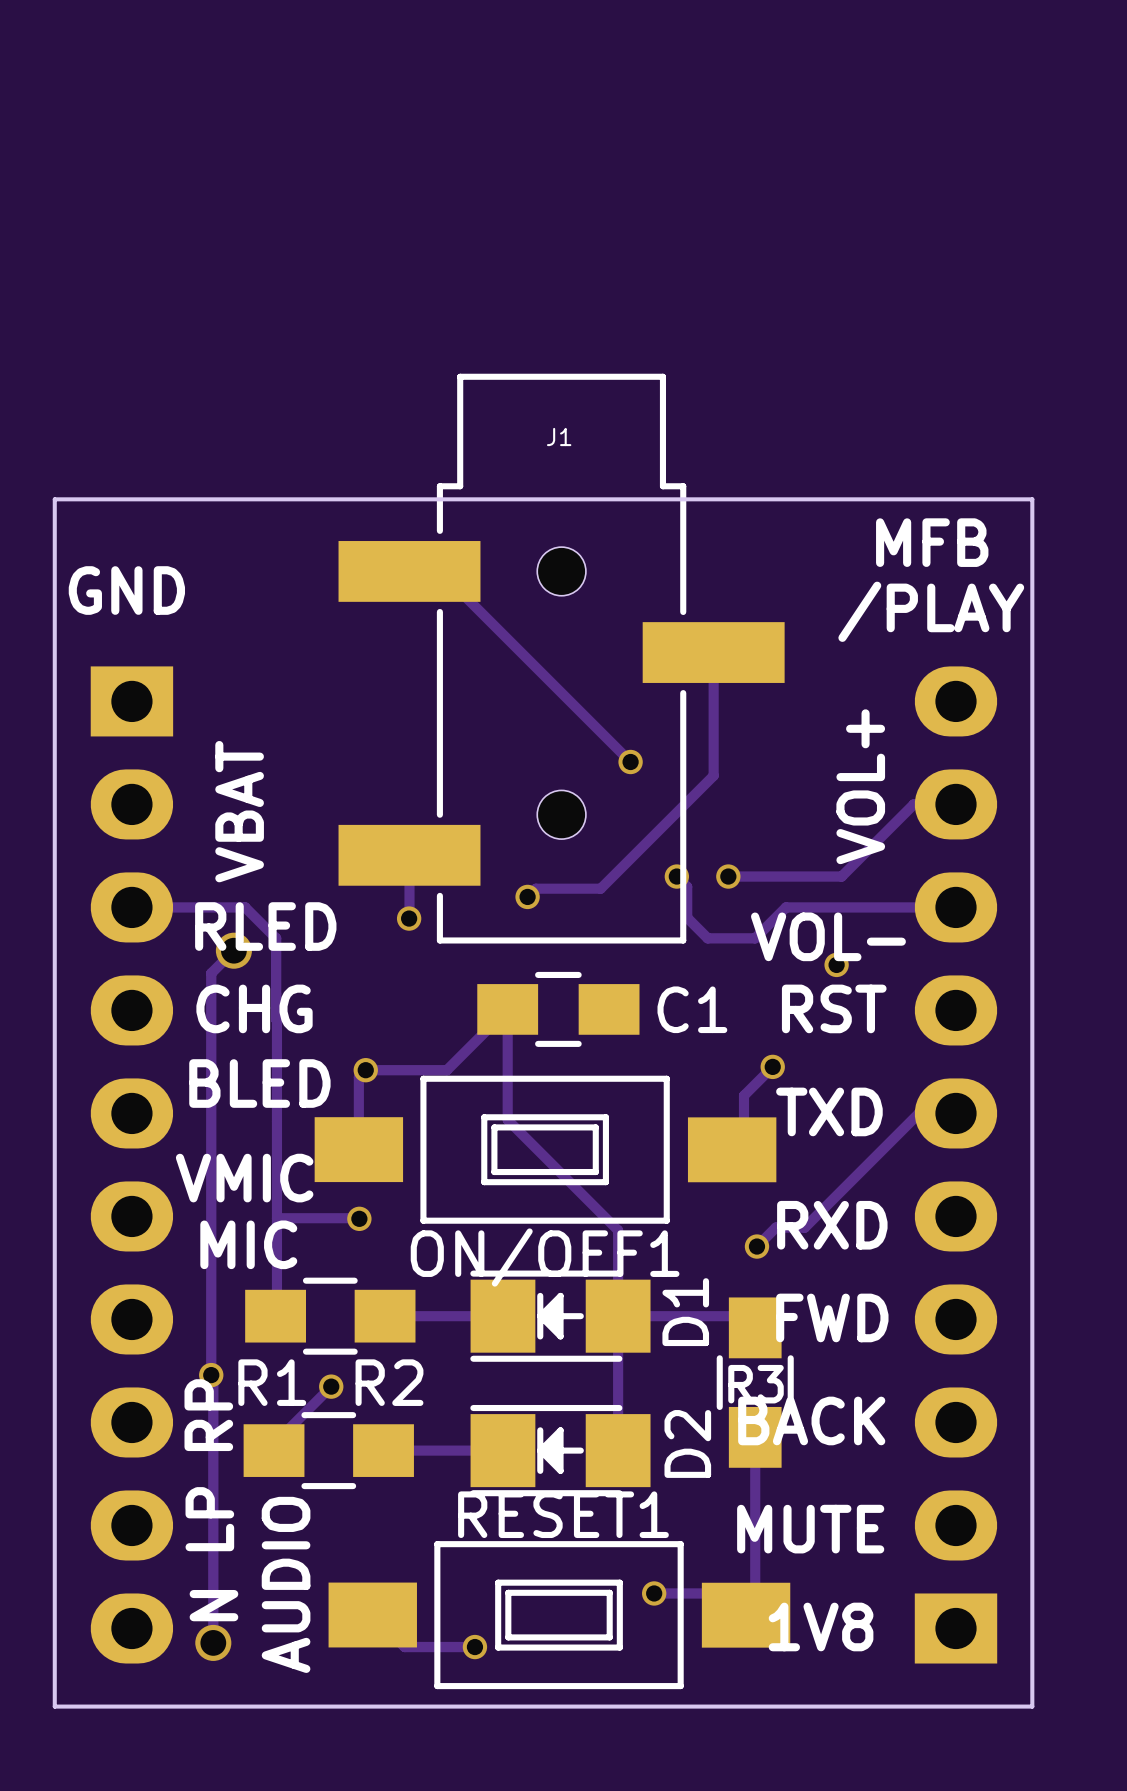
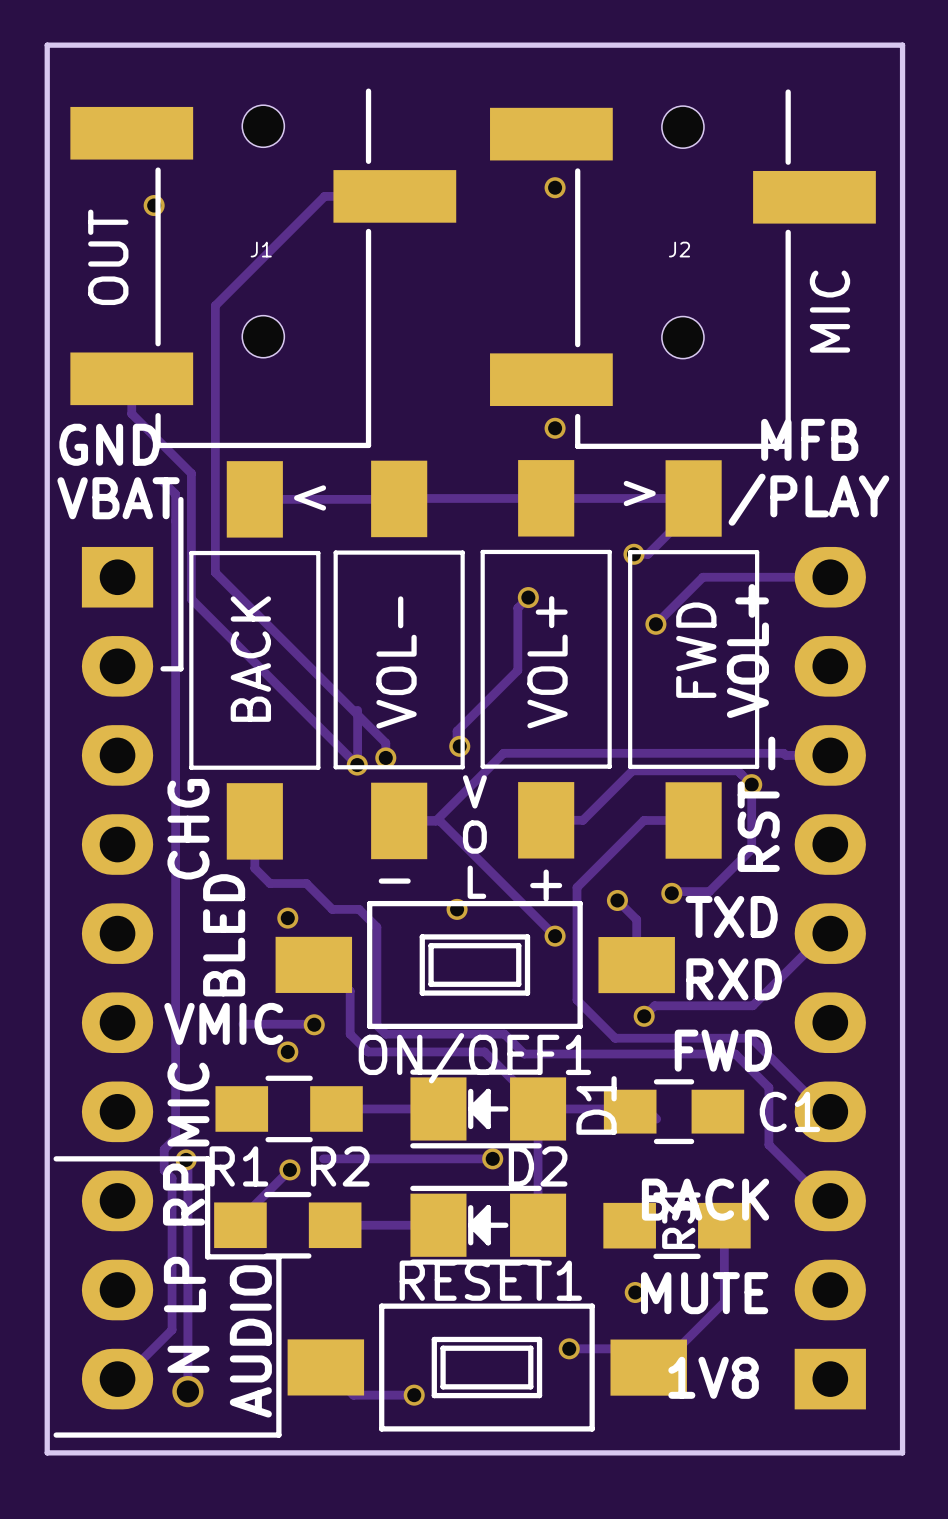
via: none -> (555, 187)
track: none -> (394, 196) (324, 196) (215, 305) (215, 572) (385, 743) (385, 757)
via: none -> (154, 205)
text: none -> OUT (108, 257)
J2: none -> (682, 269)
J1 footprint: [338, 373, 785, 944] -> [70, 88, 457, 449]
text: none -> MIC (829, 311)
J1 name position: J1 (559, 437) -> J1 (261, 249)
track: none -> (131, 378) (131, 413) (191, 473) (191, 599) (350, 757)
board edge: (54, 499) (54, 1706) (1032, 1706) (1032, 499) (54, 499) -> (47, 45) (47, 1452) (902, 1452) (902, 45) (47, 45)
via: none -> (555, 428)
track: (409, 571) (440, 571) (630, 761) -> none
text position: GND (126, 590) -> GND (109, 444)
track: none -> (163, 481) (175, 494) (175, 1138) (164, 1149) (164, 1170) (172, 1178) (172, 1329) (122, 1379) (117, 1379)
text: none -> > (639, 493)
text: none -> < (310, 497)
line: none -> (180, 499) (180, 668) (163, 668)
track: none -> (254, 499) (693, 498) (693, 508) (647, 554) (633, 554)
track: (713, 652) (713, 775) (600, 888) (535, 888) (527, 896) -> none
via: none -> (633, 554)
track: none -> (830, 577) (702, 577) (655, 624)
track: none -> (528, 597) (517, 608) (517, 670) (457, 731) (457, 749)
via: none -> (655, 624)
via position: (630, 761) -> (528, 597)
VOL+: none -> (546, 659)
FWD: none -> (693, 659)
BACK: none -> (254, 660)
VOL-: none -> (399, 659)
track: (924, 804) (913, 804) (841, 876) (728, 876) -> none
text rotation: 0° (239, 811) -> 90° clockwise (118, 498)
text position: VBAT (239, 811) -> VBAT (118, 498)
track: (676, 876) (687, 886) (687, 917) (707, 938) (755, 938) (786, 907) (904, 907) -> (436, 820) (503, 753) (783, 753) (785, 755)
via: (676, 876) -> none
via: (728, 876) -> none
text: none -> - (771, 753)
track: (131, 907) (245, 907) (276, 938) (276, 993) -> none
via: none -> (385, 757)
text: RLED (265, 926) -> none
text: VOL- (828, 936) -> none
text: none -> V (474, 791)
track: (233, 950) (211, 973) (211, 1375) -> none
via: (233, 950) -> none
via position: (836, 964) -> (751, 784)
track: none -> (546, 820) (583, 820) (632, 770) (737, 770) (751, 784) (751, 849) (709, 891) (679, 891)
track: none -> (693, 820) (643, 820) (577, 887) (577, 1000) (615, 1038) (751, 1038) (824, 1111) (830, 1111)
track: none -> (254, 821) (254, 868) (269, 883) (306, 883) (332, 909) (359, 909) (376, 927) (376, 1025) (385, 1034) (504, 1034) (524, 1054) (735, 1054) (768, 1087) (768, 1144) (824, 1200) (830, 1200)
track: none -> (399, 820) (439, 820) (555, 936)
text: none -> O (474, 837)
text rotation: 0° (254, 1008) -> 90° counterclockwise (188, 829)
text rotation: 0° (834, 1008) -> 90° counterclockwise (758, 826)
C1 position: (558, 1009) -> (674, 1111)
track: (276, 1019) (275, 1316) -> none
text: none -> - (394, 881)
text: none -> L (476, 882)
text: none -> + (546, 885)
track: (772, 1066) (744, 1095) (744, 1149) -> none
via position: (365, 1070) -> (287, 918)
track: none -> (617, 900) (636, 919) (636, 965)
via: none -> (617, 900)
text rotation: 0° (259, 1083) -> 90° counterclockwise (224, 935)
via: none -> (457, 909)
text position: TXD (829, 1111) -> TXD (731, 916)
track: (949, 1113) (918, 1113) (804, 1227) (775, 1227) (756, 1246) -> (824, 933) (752, 1005) (654, 1005) (644, 1016)
via: none -> (555, 936)
track: (358, 1125) (358, 1077) (365, 1070) (446, 1070) (507, 1009) (507, 1119) (618, 1230) (618, 1312) -> (313, 964) (323, 964) (350, 991) (350, 1034) (367, 1051) (484, 1051) (538, 1105)
text position: VMIC (244, 1178) -> VMIC (223, 1023)
text position: RXD (832, 1225) -> RXD (734, 979)
text rotation: 0° (248, 1244) -> 90° counterclockwise (188, 1104)
via position: (756, 1246) -> (644, 1016)
via: none -> (287, 1051)
text position: FWD (832, 1317) -> FWD (723, 1050)
line: none -> (56, 1158) (207, 1158) (207, 1256) (278, 1256) (278, 1435) (56, 1435)
track: none -> (323, 1158) (492, 1158)
via: none -> (492, 1158)
R3 rotation: 0° (755, 1382) -> 90° clockwise (677, 1225)
track: (755, 1437) (755, 1606) -> none
D2 name rotation: 0° (687, 1443) -> 90° clockwise (538, 1166)
track: none -> (724, 1225) (724, 1302) (658, 1367) (648, 1367)
via: none -> (635, 1292)

